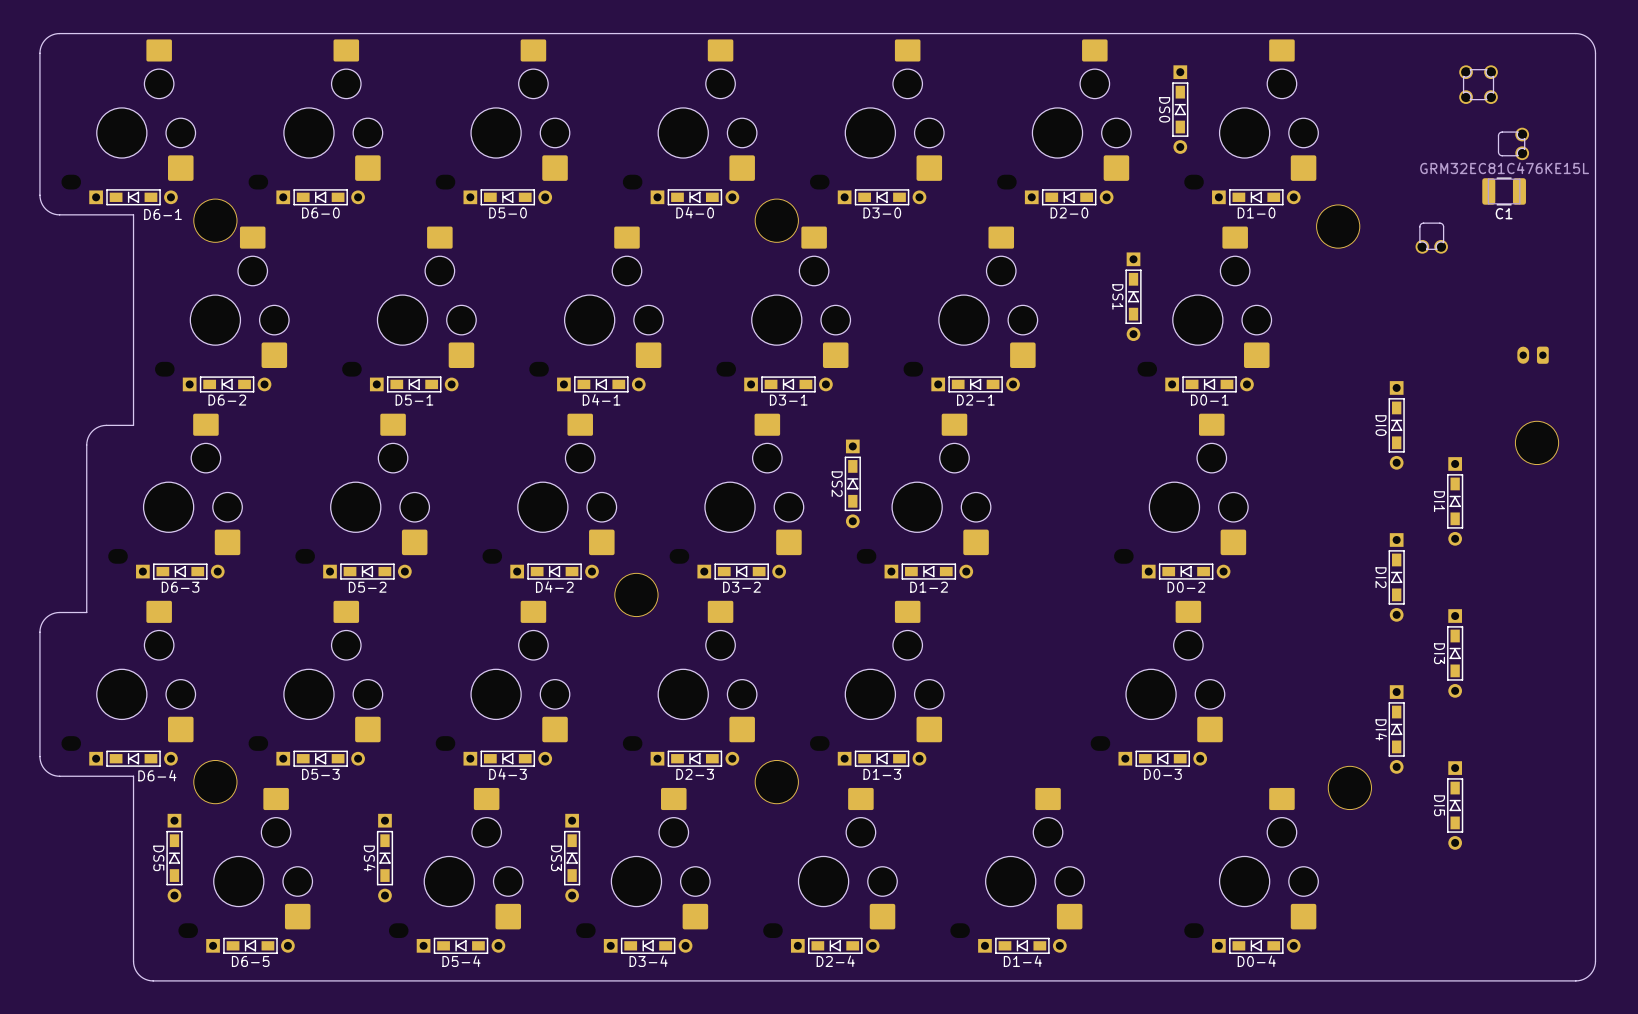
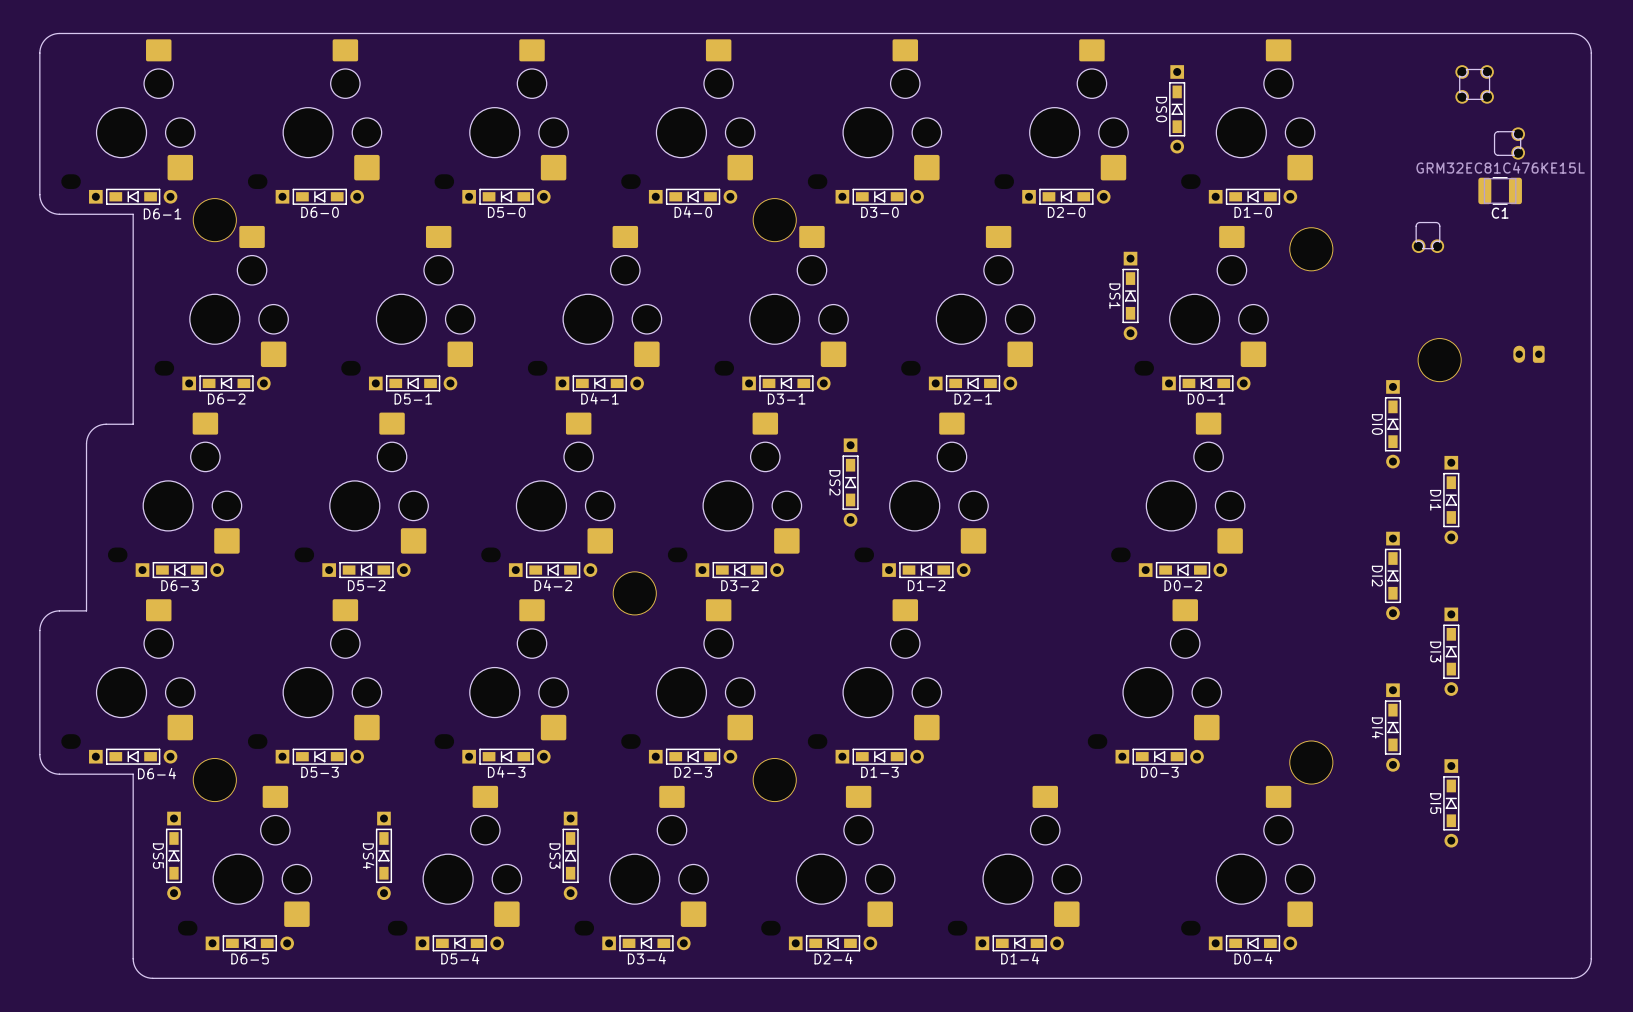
part position: (1338, 226) -> (1311, 249)
part: none -> (1439, 360)
part: (1537, 442) -> none
part position: (1349, 787) -> (1311, 762)

